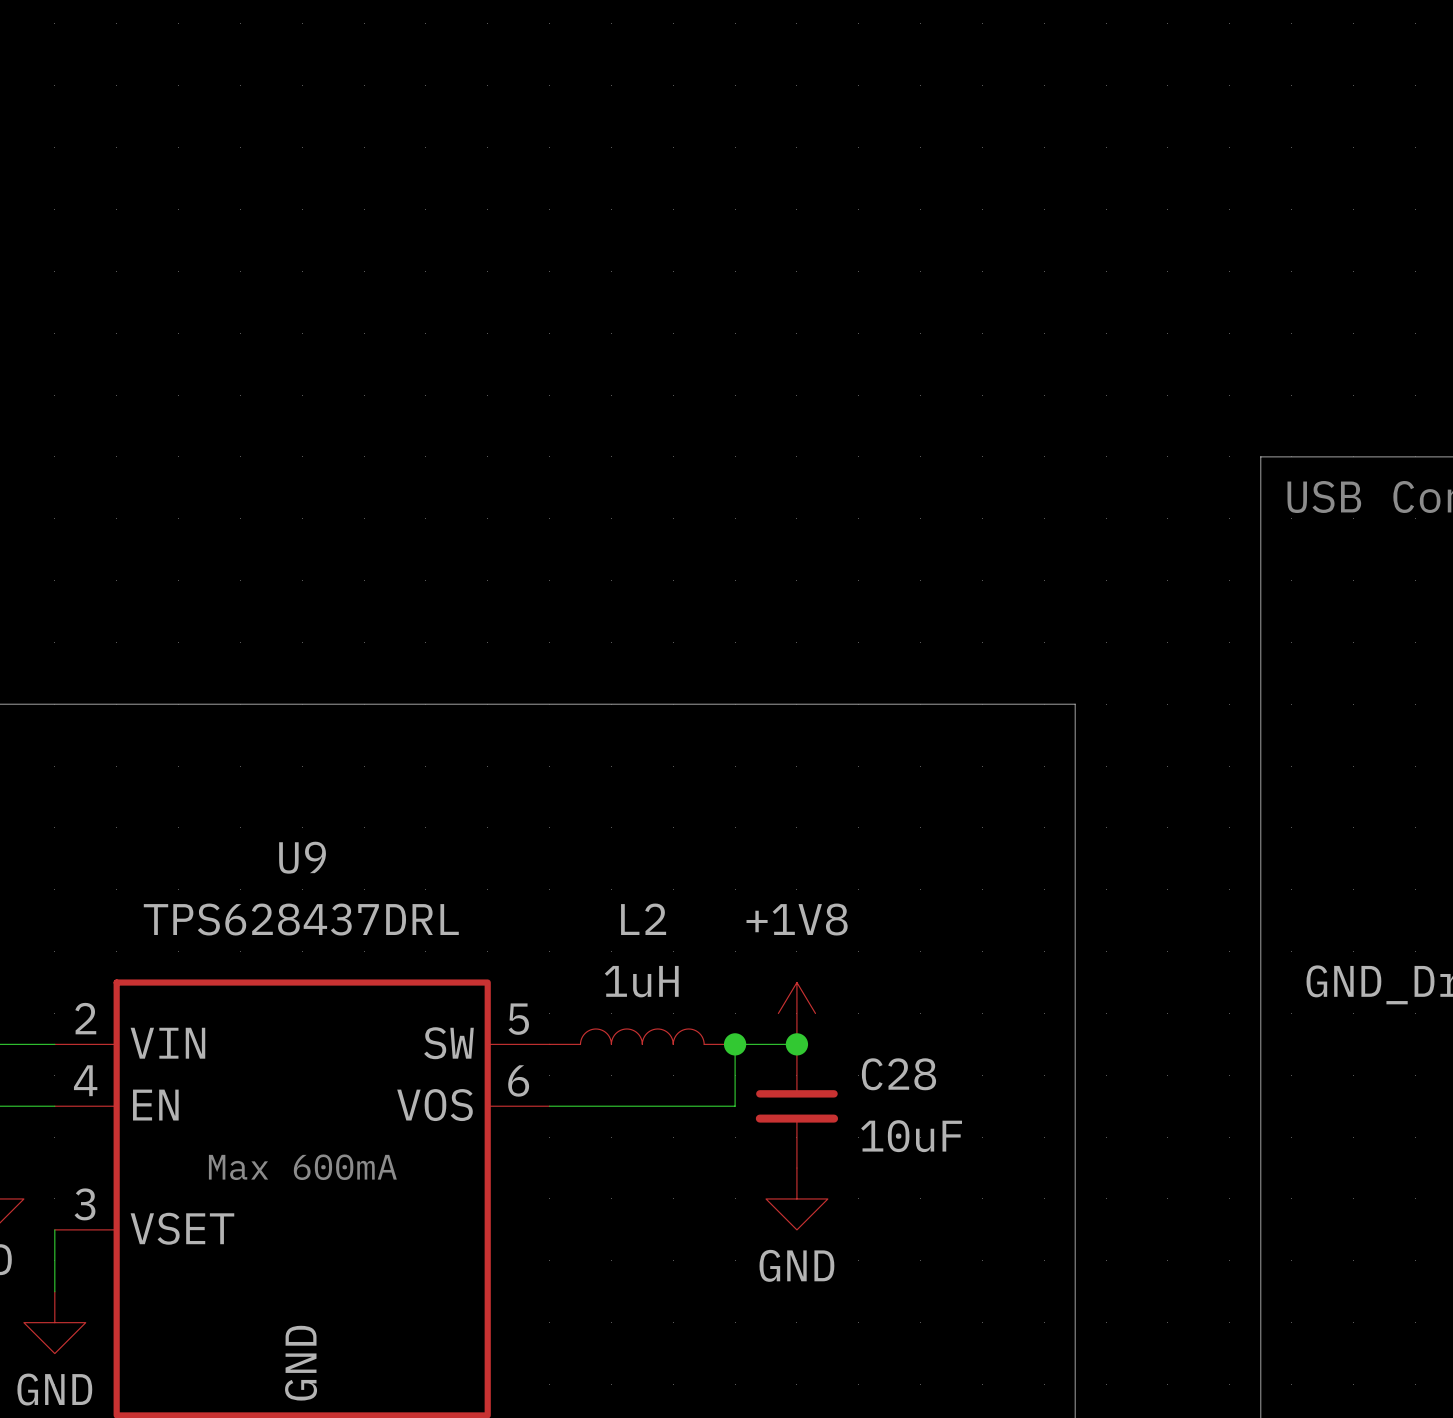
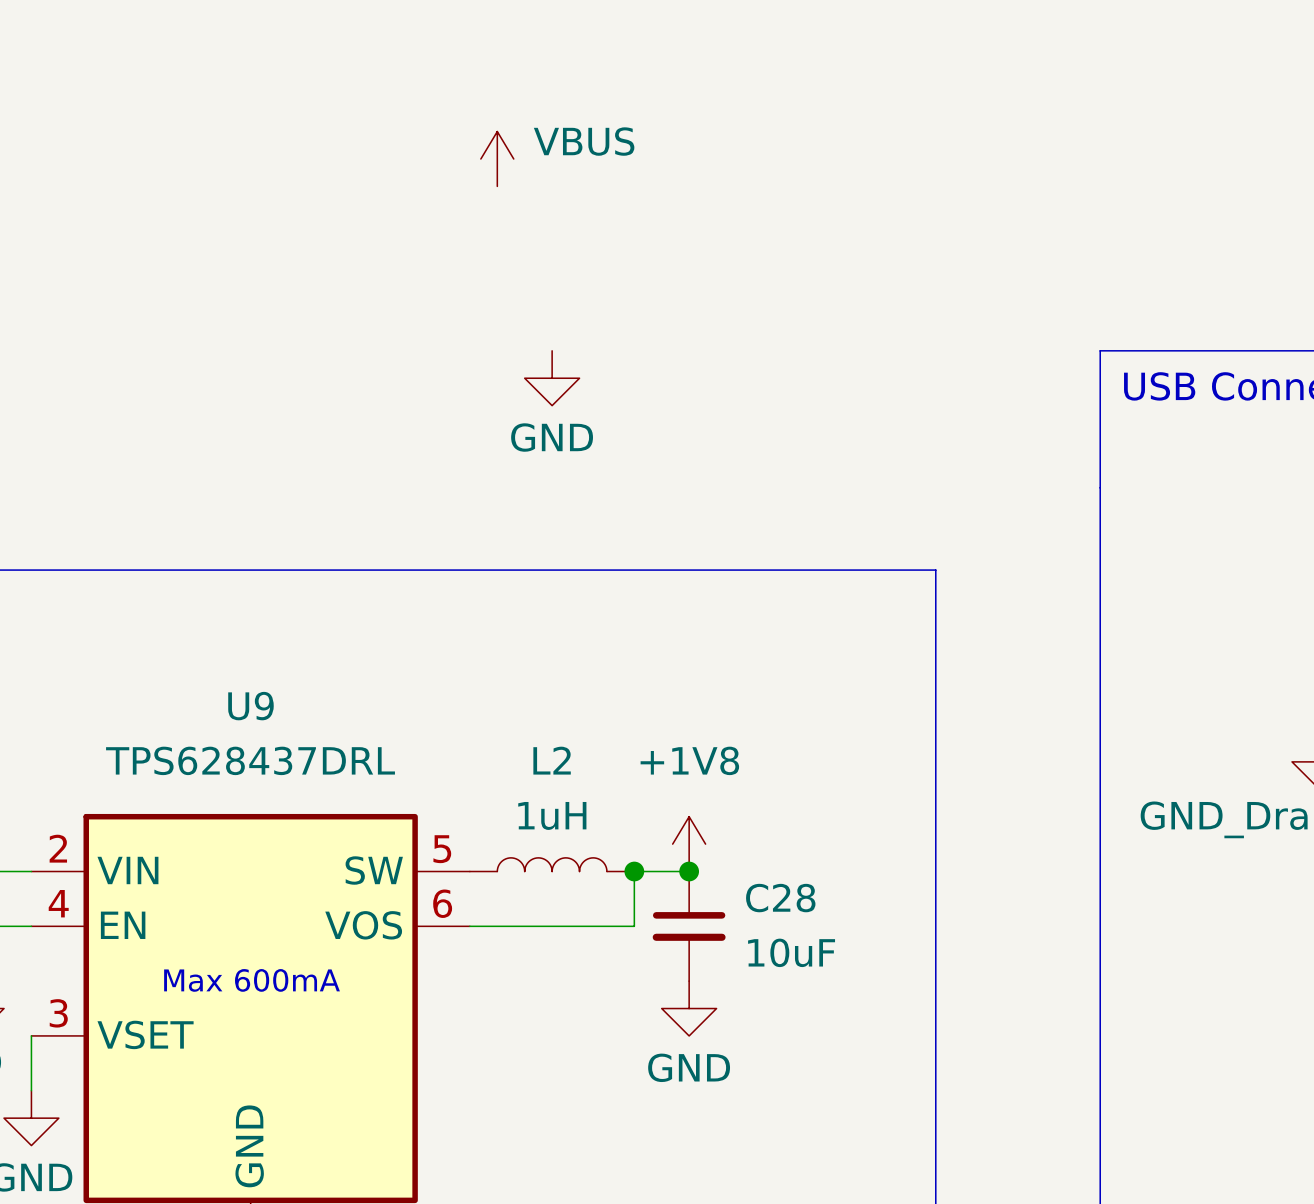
power symbol: none -> VBUS (497, 158)
power symbol: none -> GND (552, 378)

